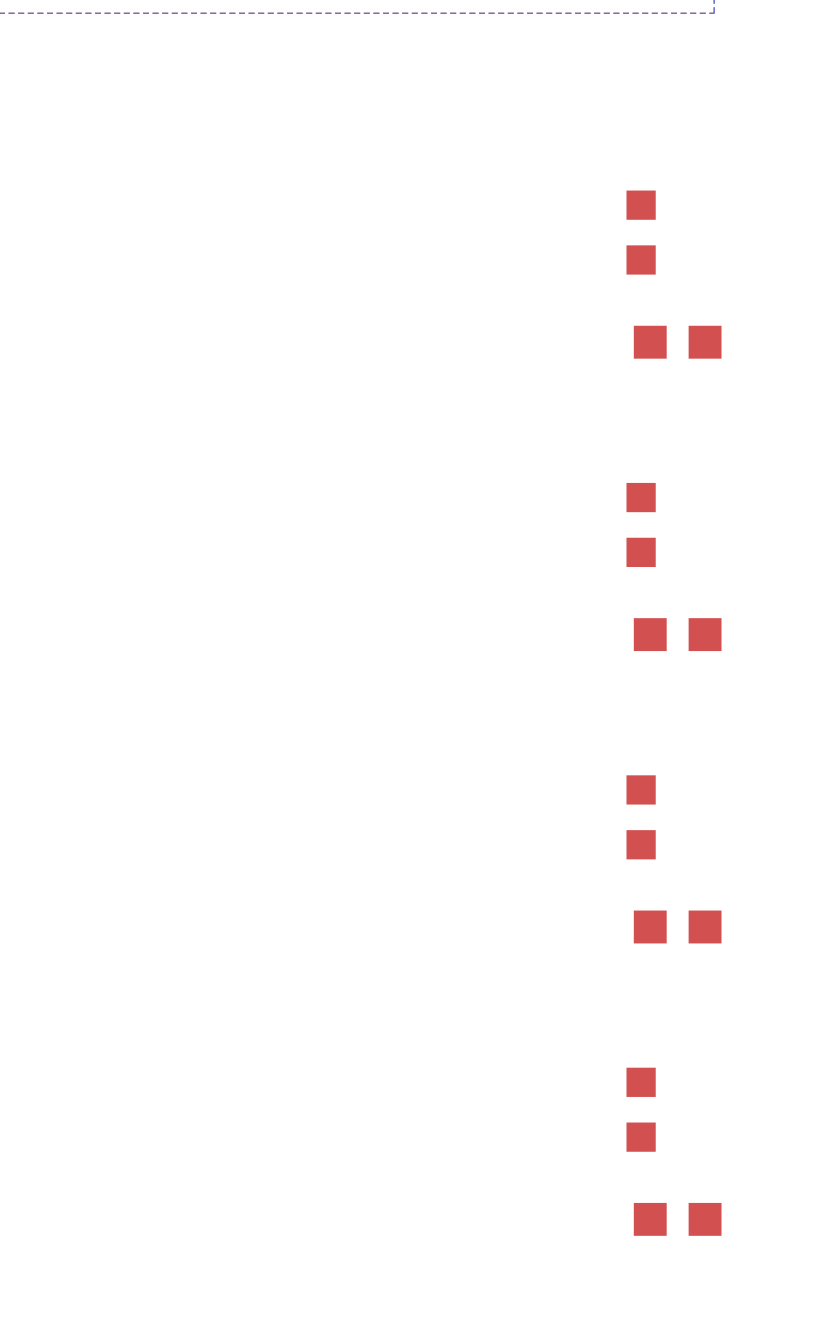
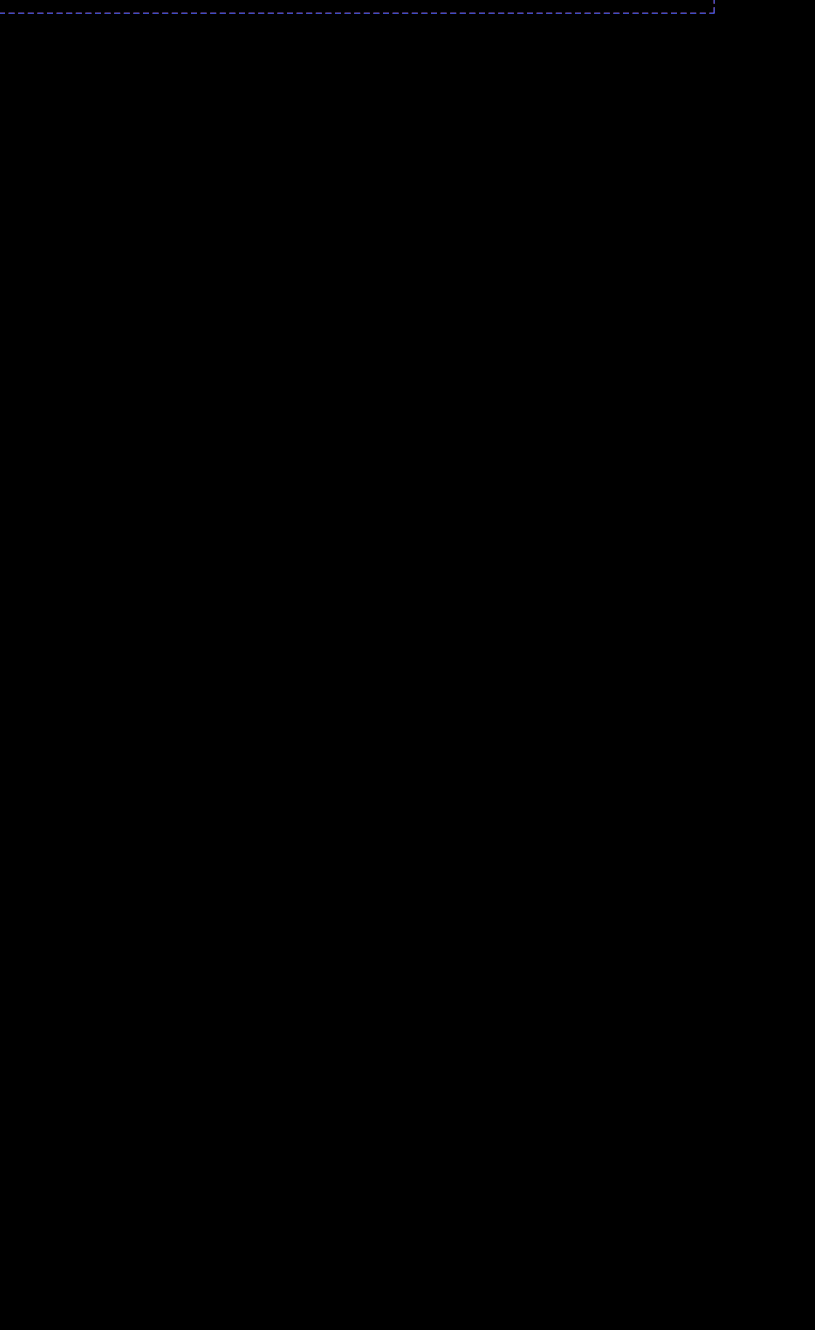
part: (641, 232) -> none
part: (677, 342) -> none
part: (641, 524) -> none
part: (677, 634) -> none
part: (641, 817) -> none
part: (677, 926) -> none
part: (641, 1109) -> none
part: (677, 1219) -> none

